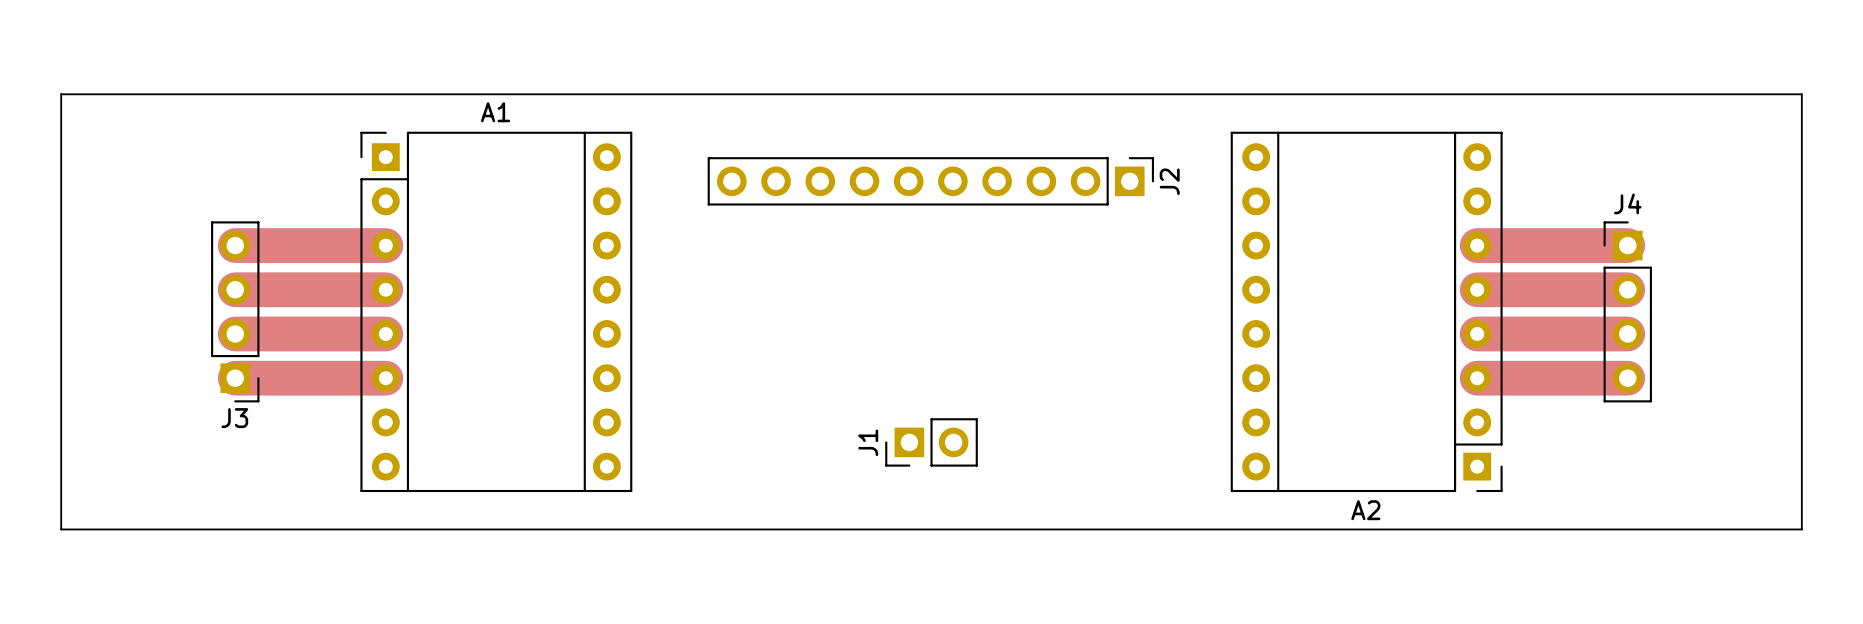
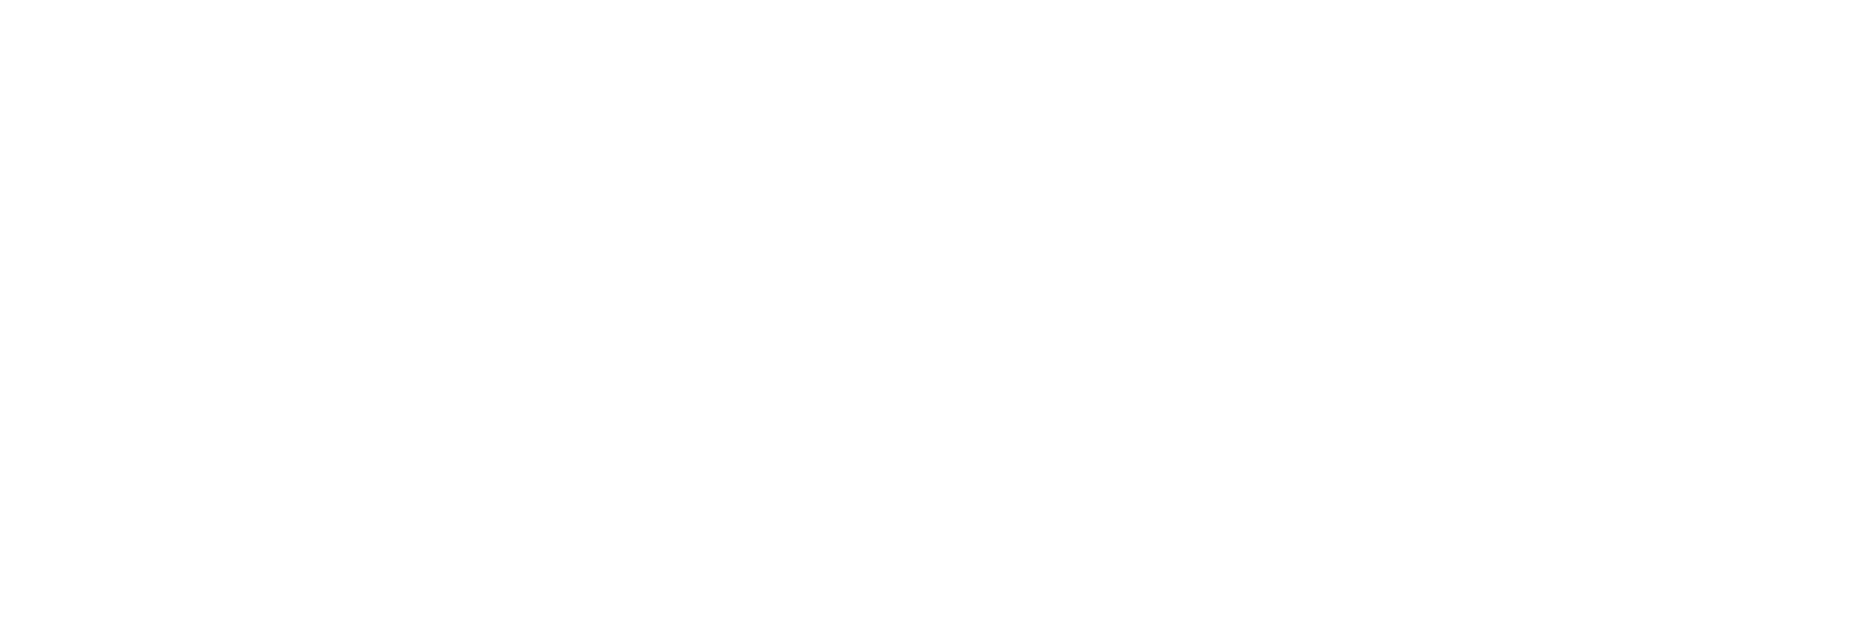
board edge: (61, 94) (61, 529) (1801, 529) (1801, 94) (61, 94) -> none
J2: (930, 181) -> none
top track: (235, 245) (385, 245) -> none
top track: (1477, 245) (1627, 245) -> none
top track: (235, 289) (385, 289) -> none
top track: (1477, 289) (1627, 289) -> none
J3: (235, 311) -> none
A1: (496, 311) -> none
A2: (1366, 311) -> none
J4: (1627, 311) -> none
top track: (235, 333) (385, 333) -> none
top track: (1477, 333) (1627, 333) -> none
top track: (235, 378) (385, 378) -> none
top track: (1477, 378) (1627, 378) -> none
J1: (931, 442) -> none

